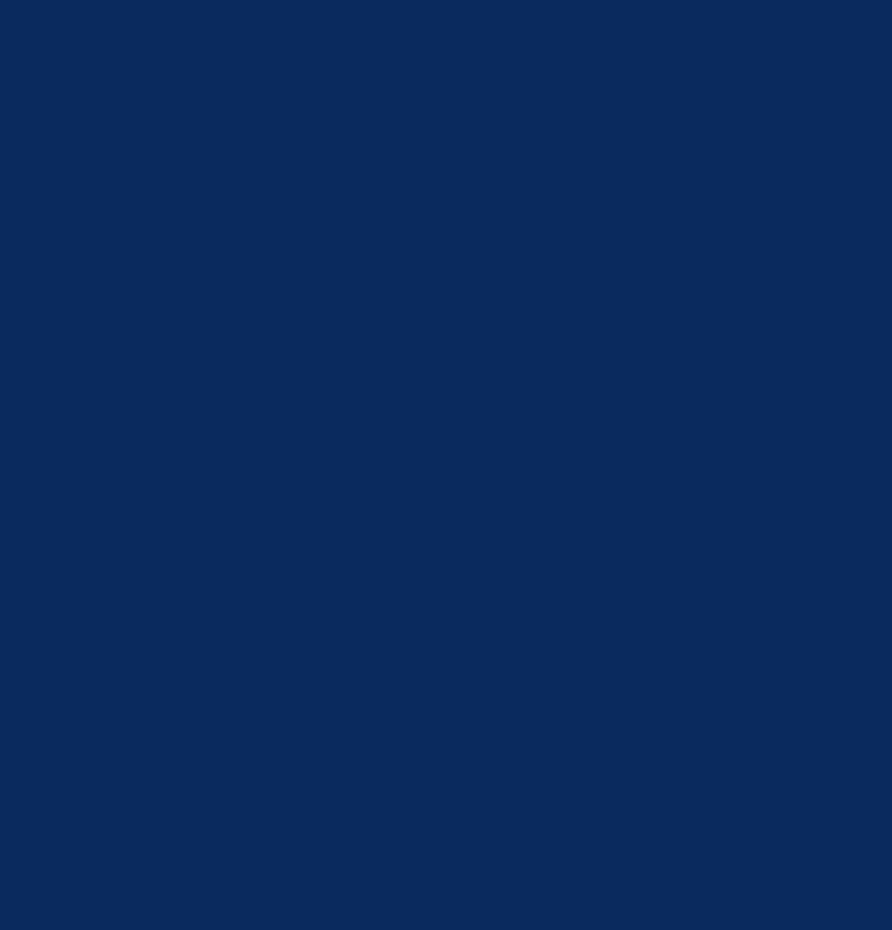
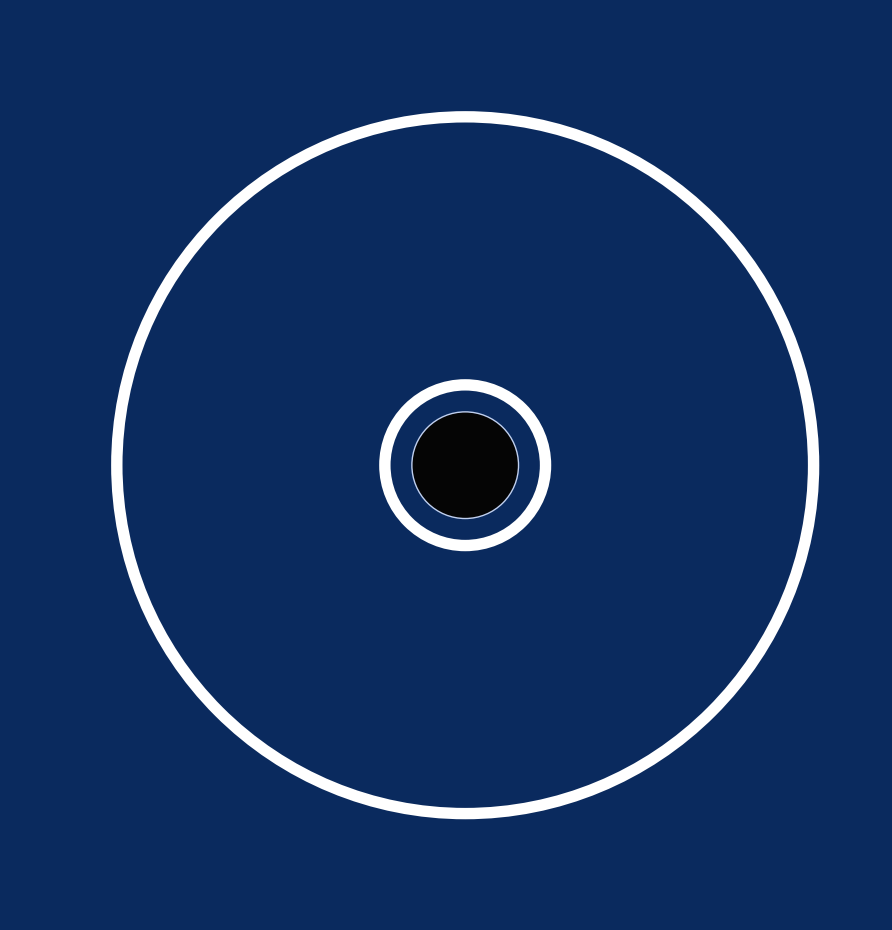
drawing: none -> [111, 111, 820, 820]
hole: none -> (465, 465)

